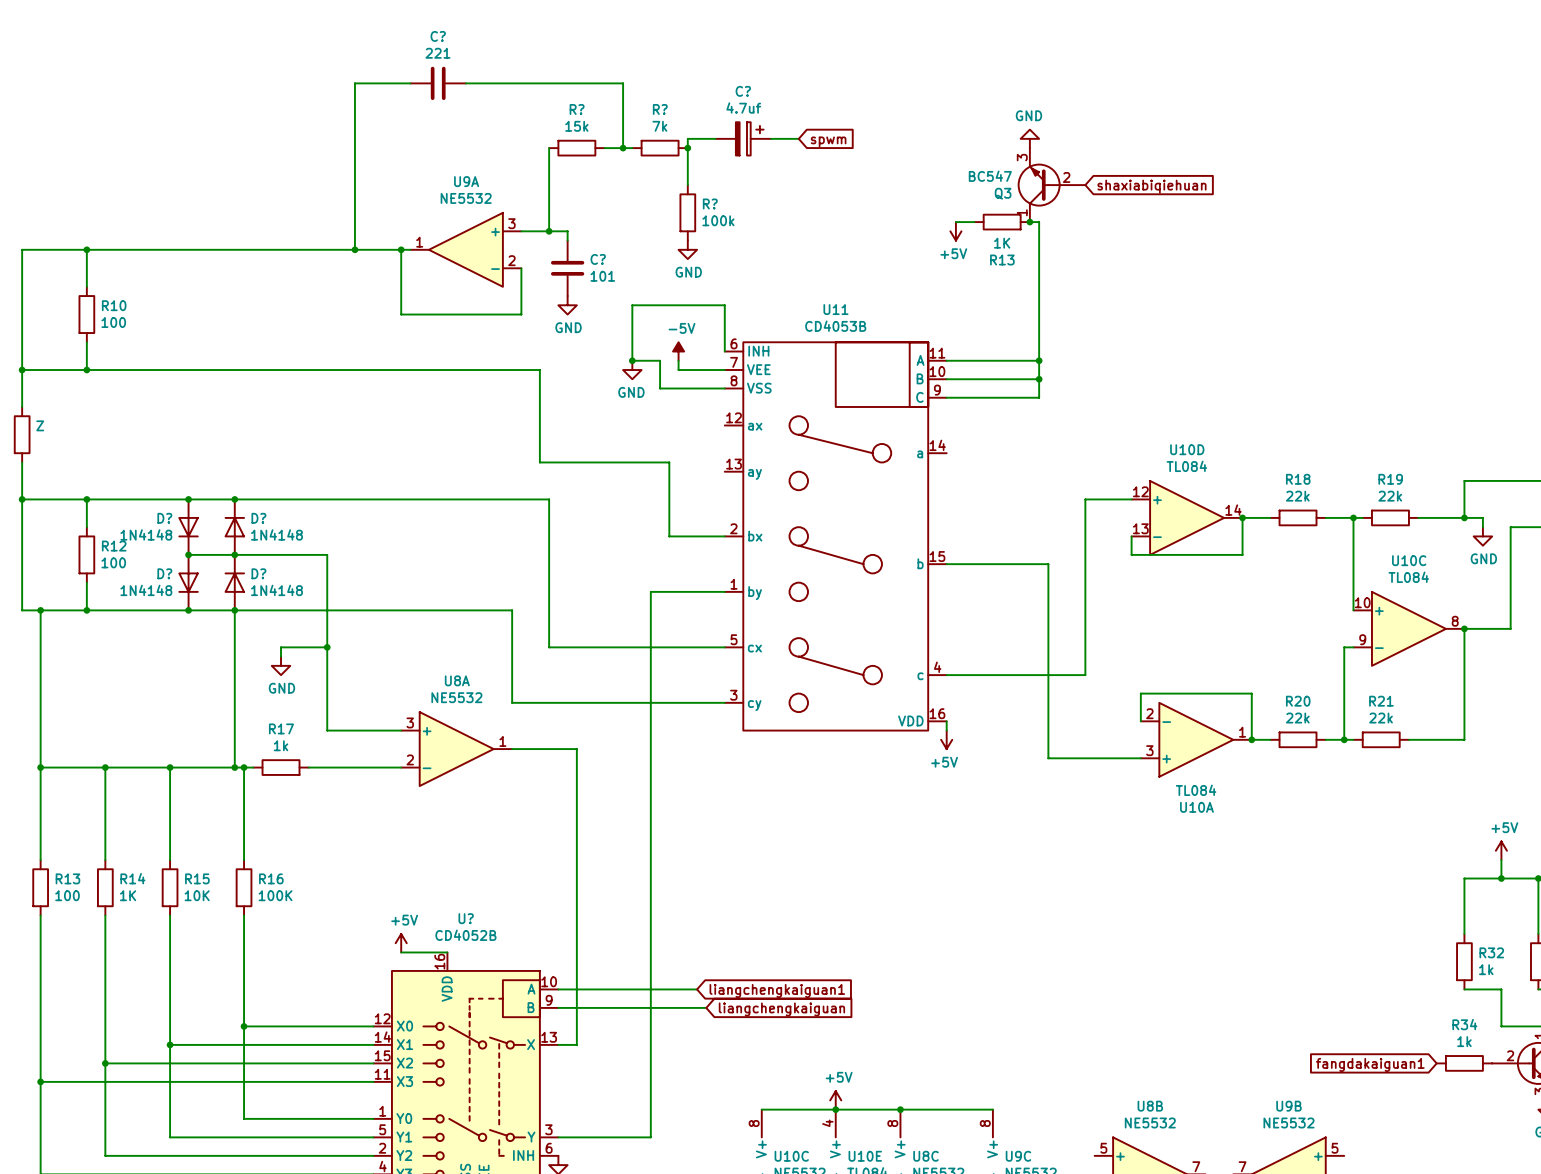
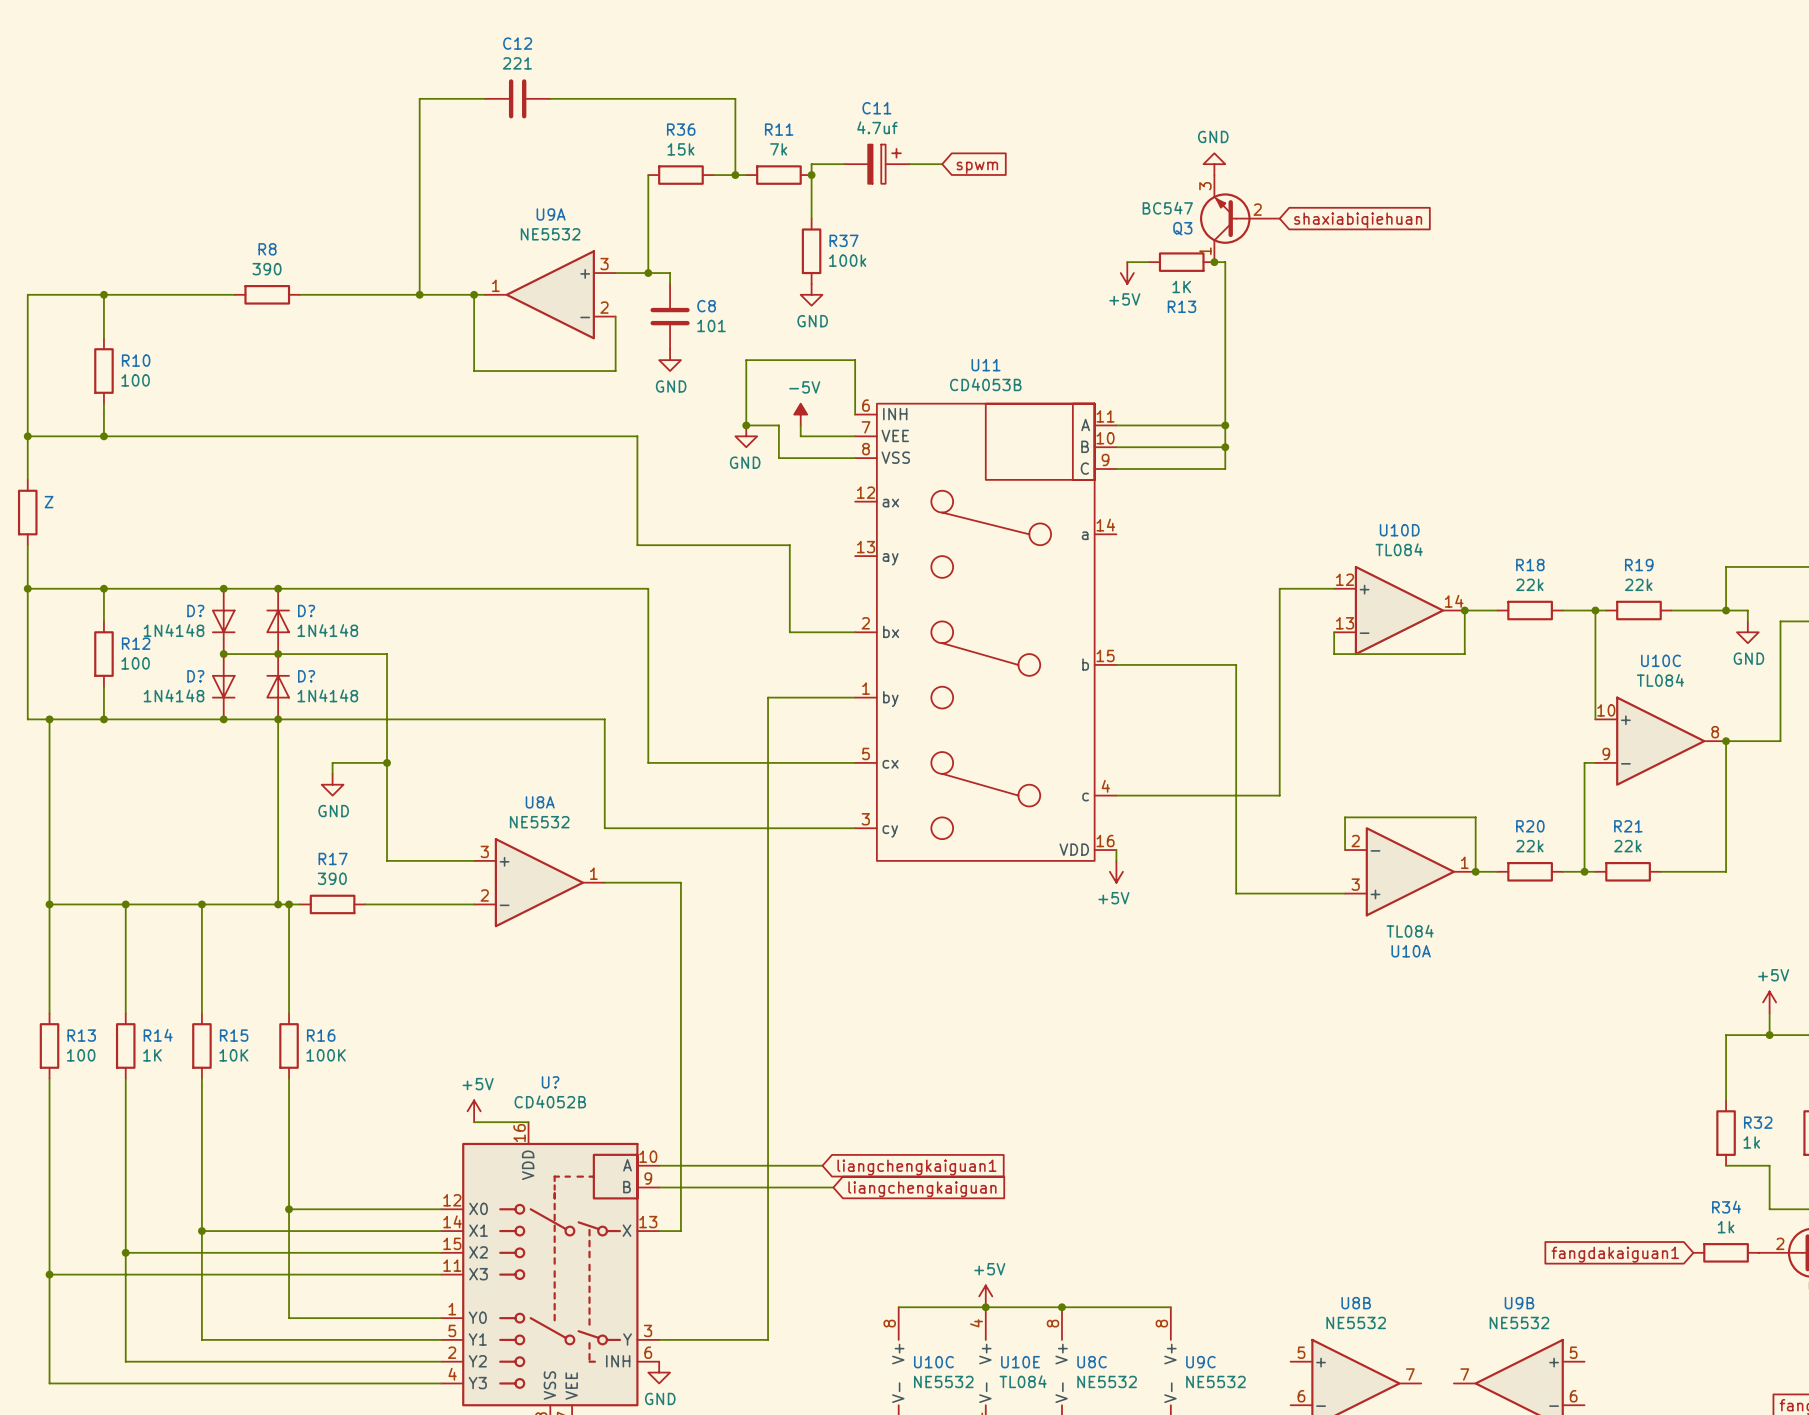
C? name: C? (438, 36) -> C12 (517, 43)
C? name: C? (743, 91) -> C11 (876, 108)
R? name: R? (577, 109) -> R36 (681, 129)
R? name: R? (660, 109) -> R11 (779, 129)
R? name: R? (710, 203) -> R37 (844, 240)
wire: (197, 249) (253, 249) -> none
R8: none -> 390 (267, 294)
C? name: C? (598, 259) -> C8 (706, 306)
R17 value: 1k (281, 745) -> 390 (332, 878)

